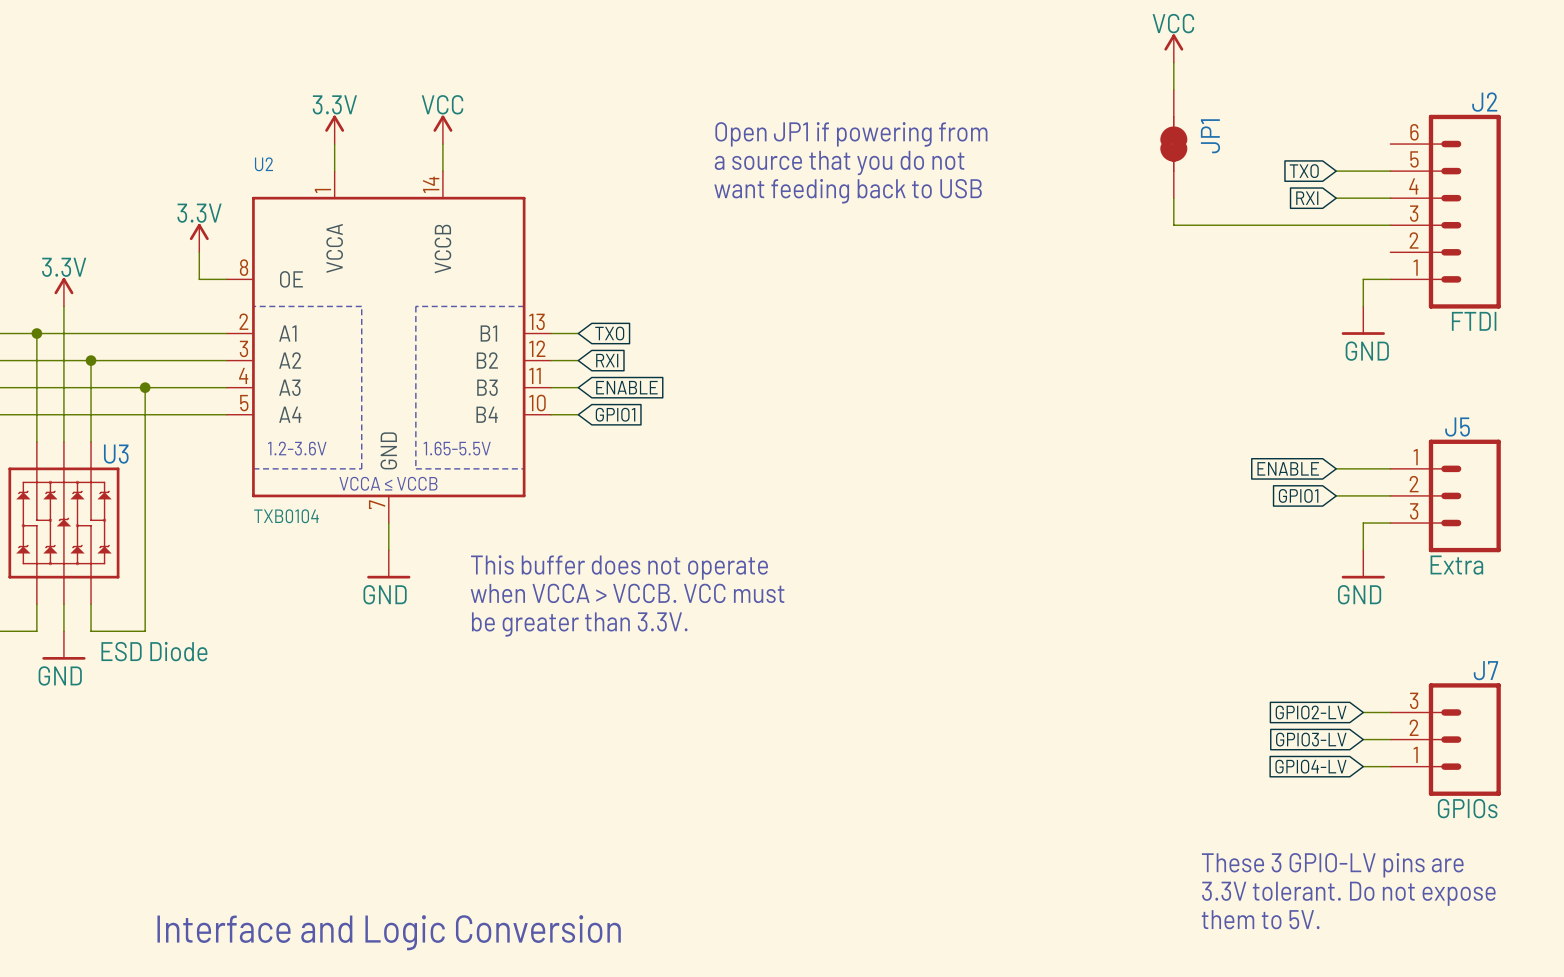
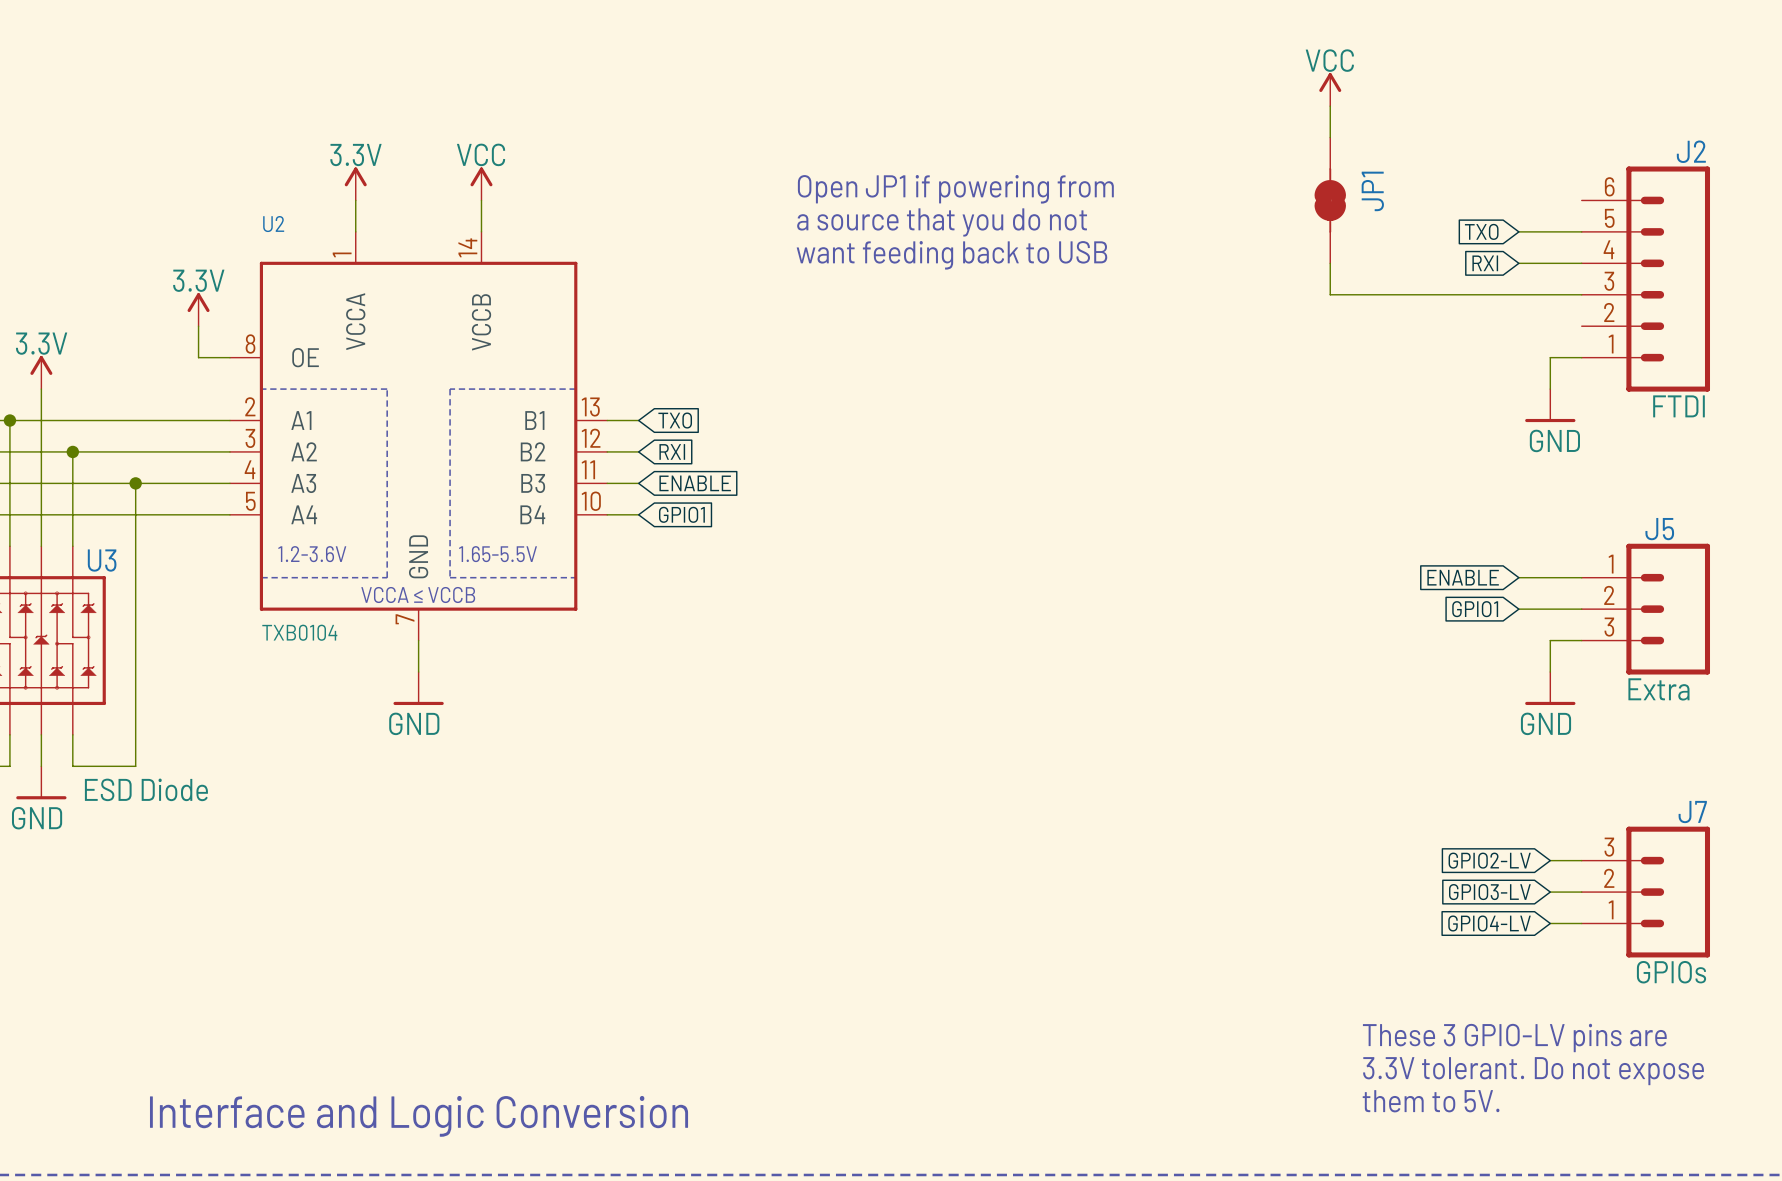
text: This buffer does not operate (619, 567) -> none
text: when VCCA > VCCB. VCC must (627, 593) -> none
text: be greater than 3.3V. (579, 624) -> none

